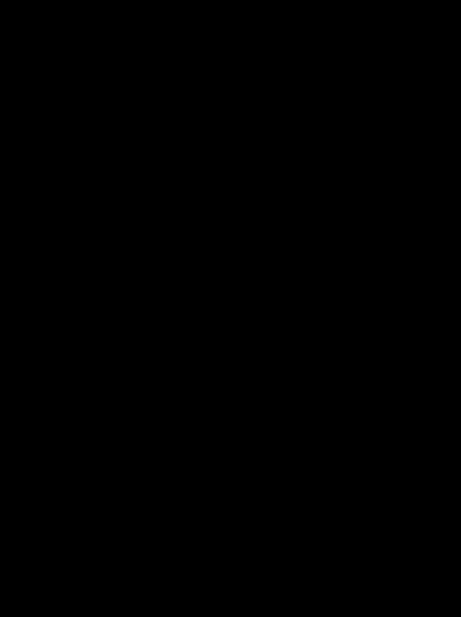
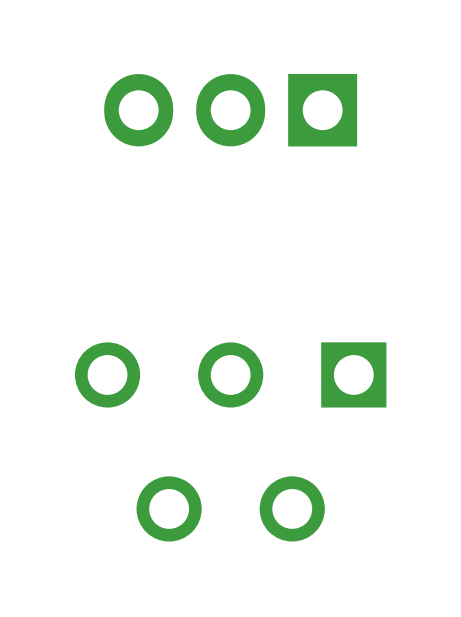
part: none -> (230, 110)
part: none -> (230, 441)

